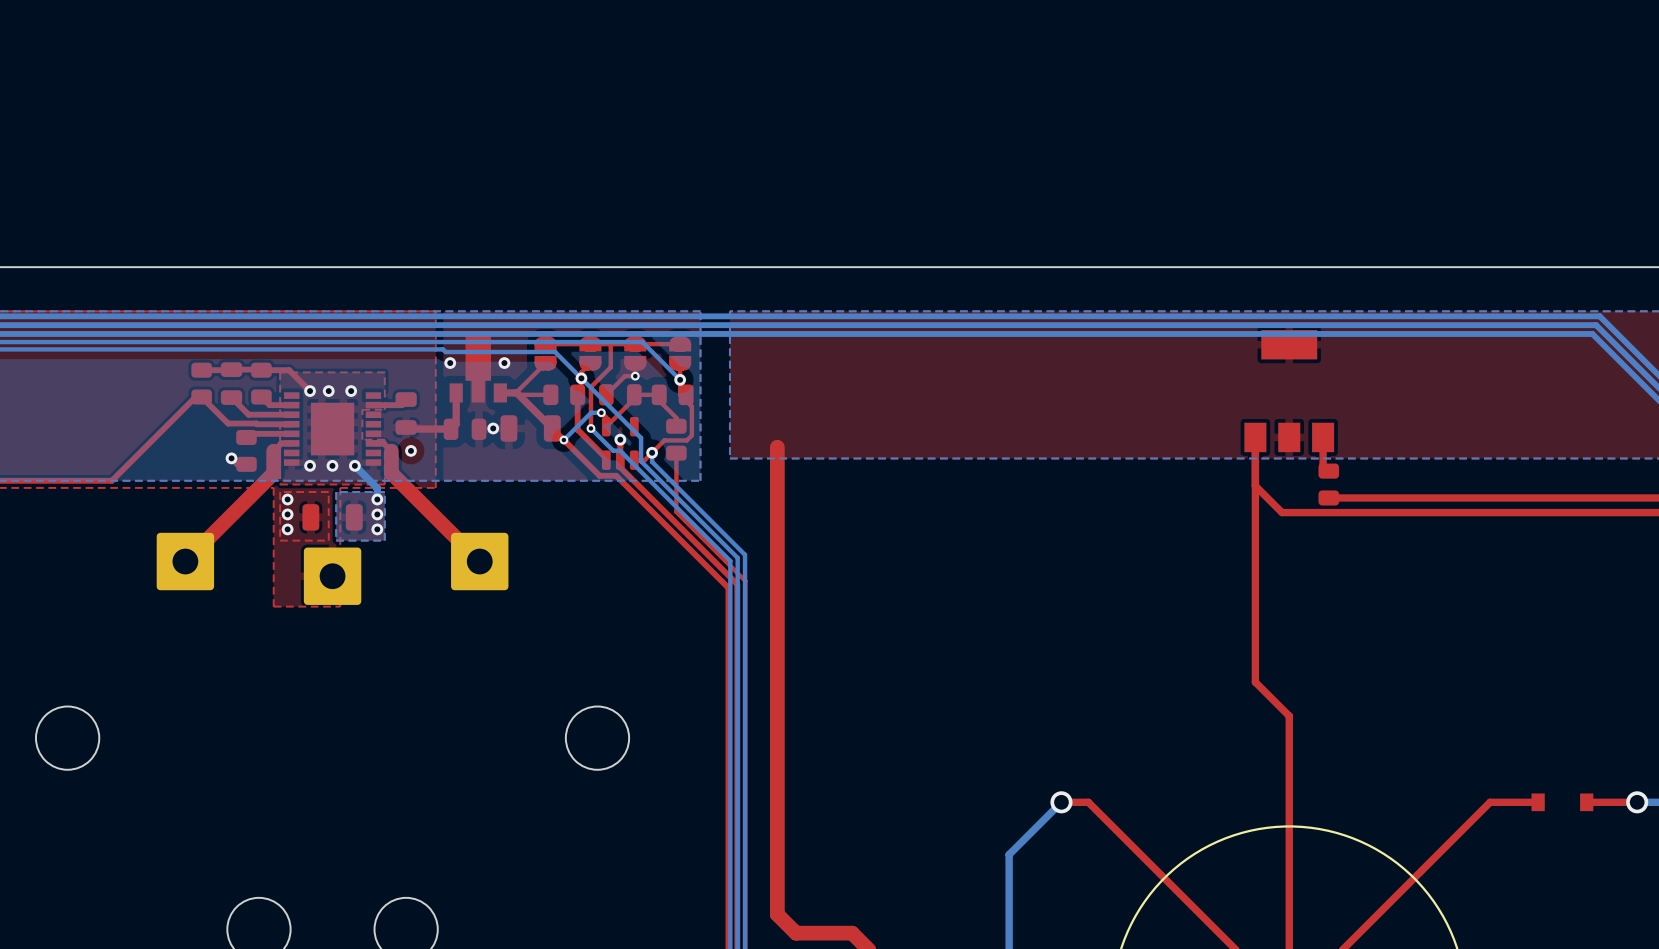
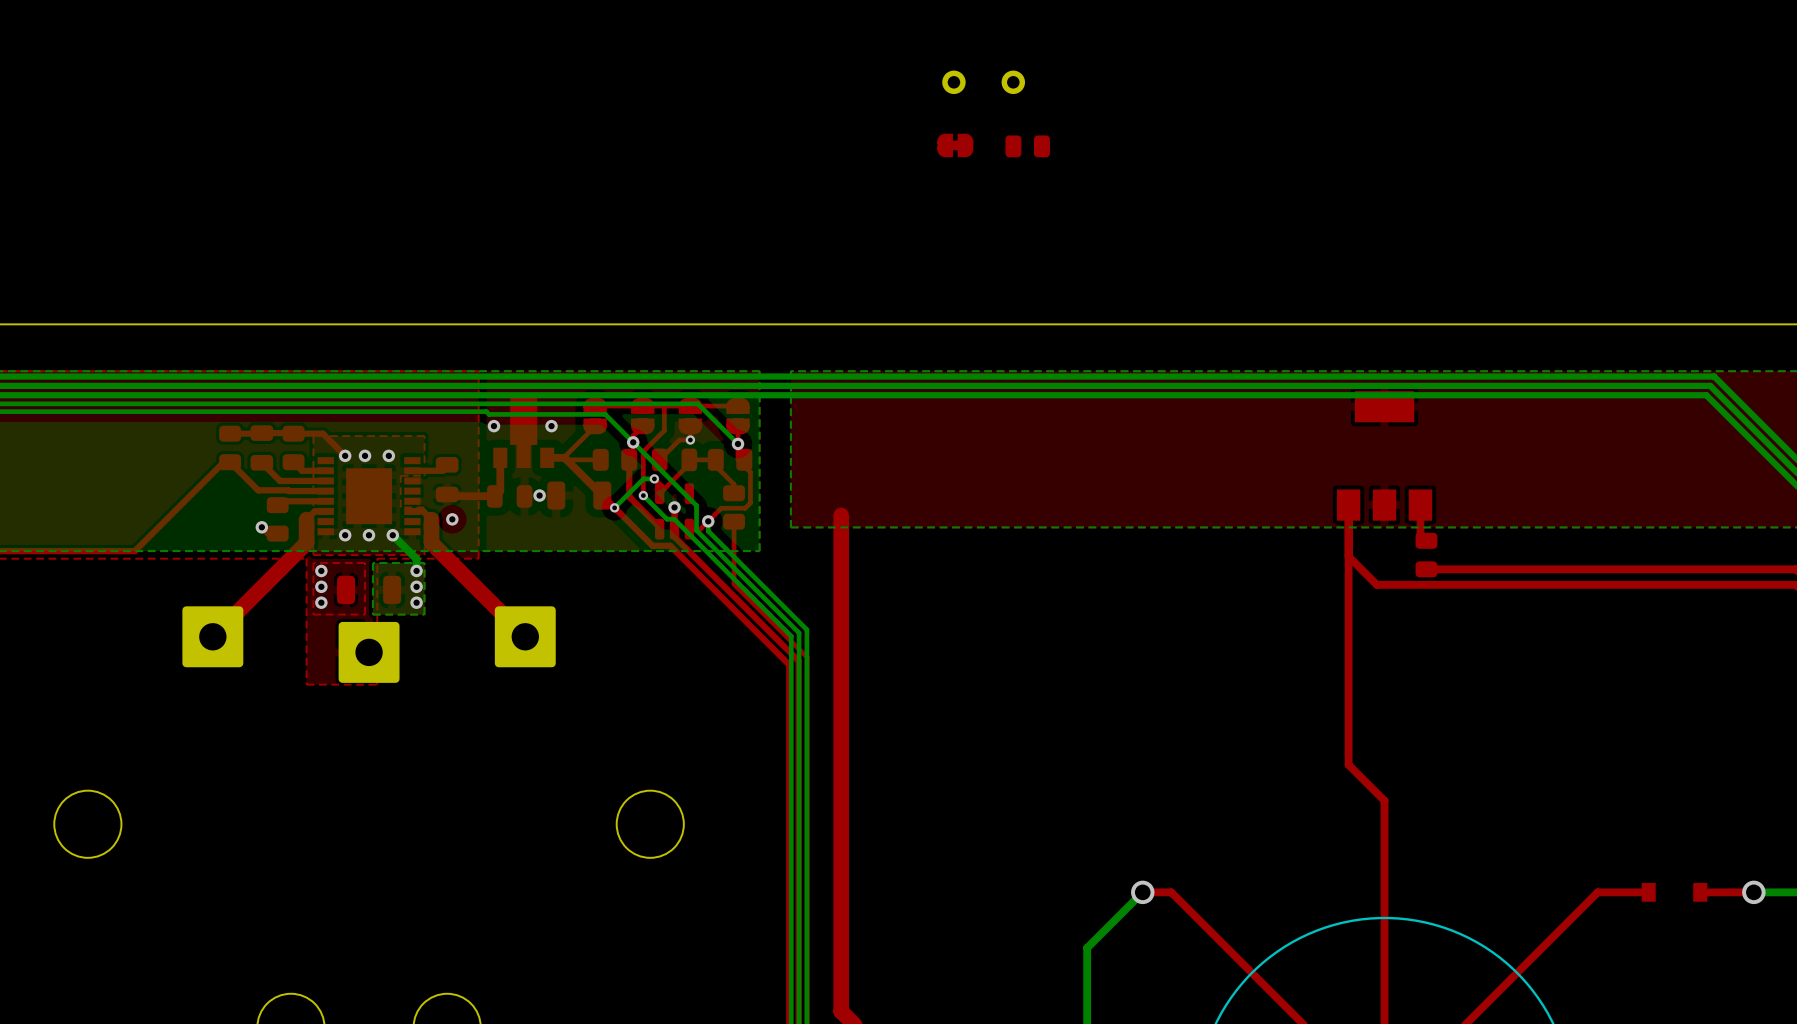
part: none -> (983, 82)
part: none -> (955, 145)
part: none -> (1027, 146)

